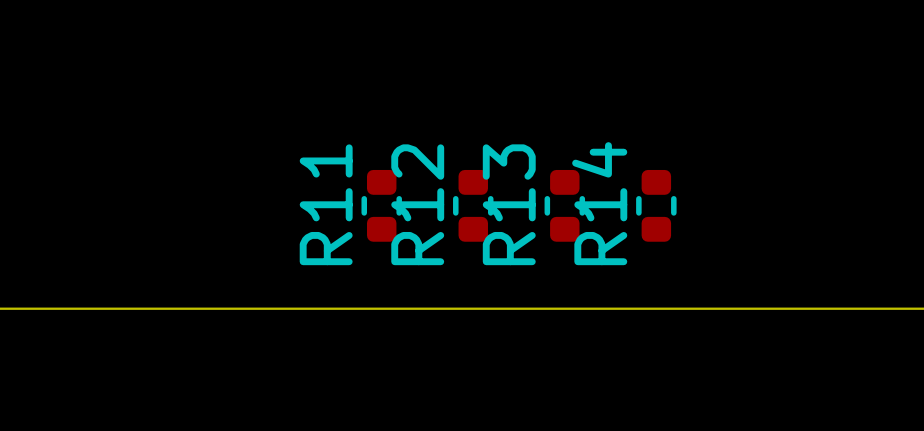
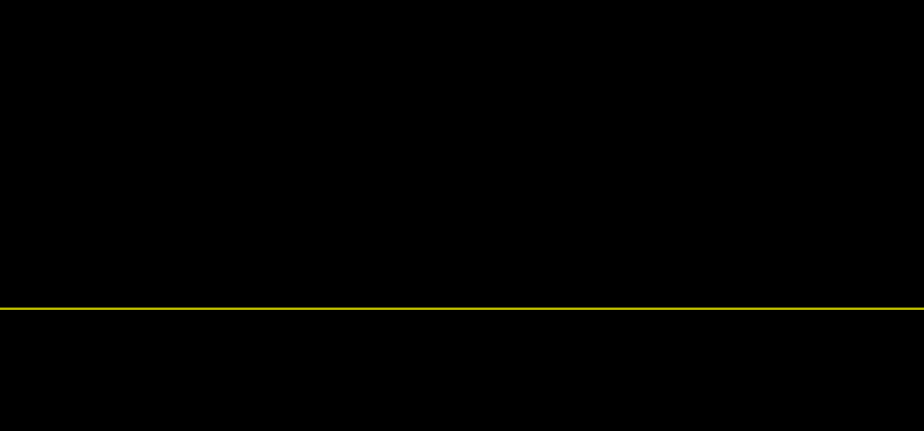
R11: (381, 205) -> none
R12: (473, 205) -> none
R13: (564, 205) -> none
R14: (656, 205) -> none

